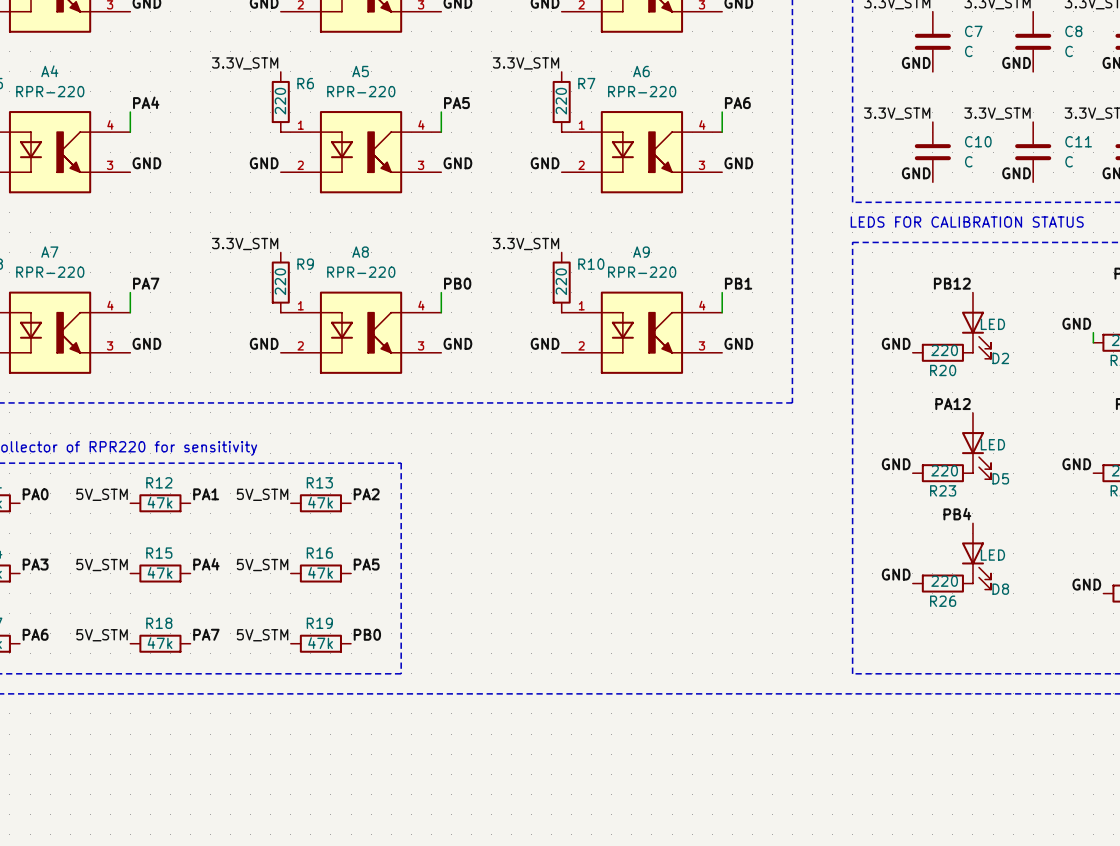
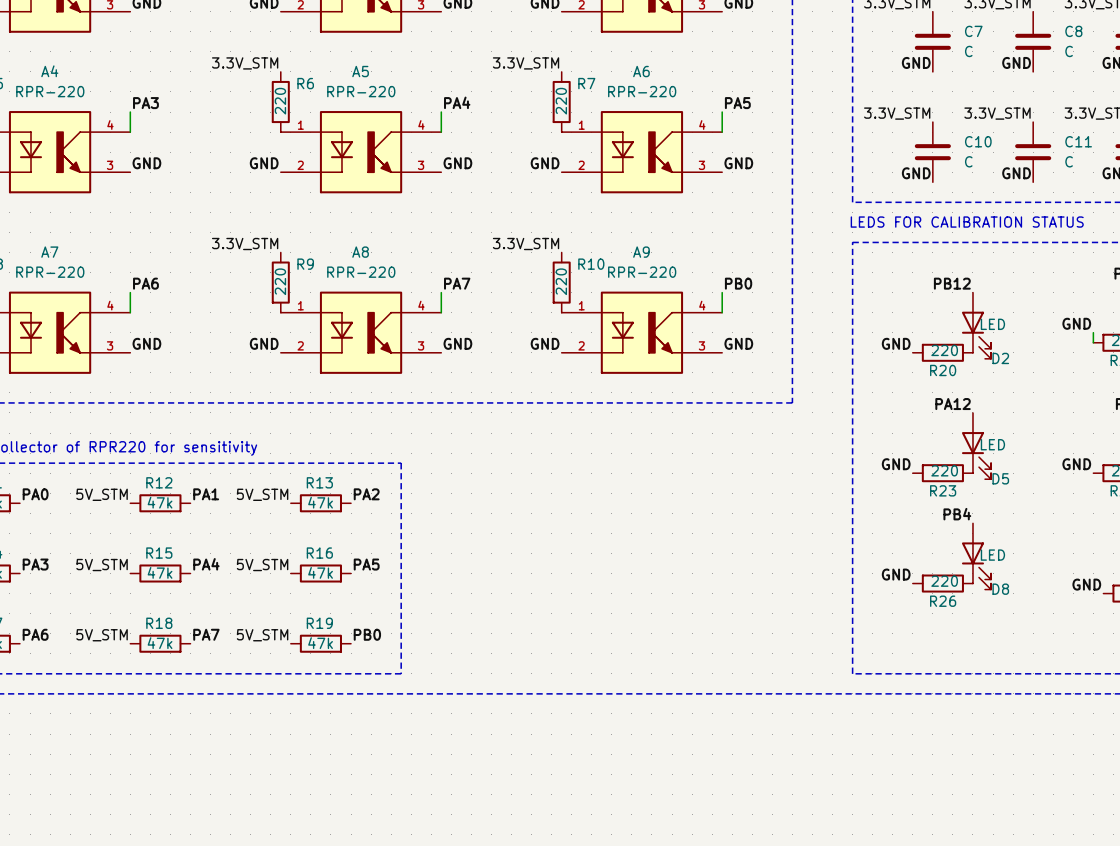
label: PA4 (146, 102) -> PA3 (145, 103)
label: PA5 (456, 103) -> PA4 (457, 102)
label: PA6 (737, 103) -> PA5 (737, 103)
label: PA7 (146, 283) -> PA6 (145, 283)
label: PB0 (457, 283) -> PA7 (457, 283)
label: PB1 (738, 283) -> PB0 (738, 283)

